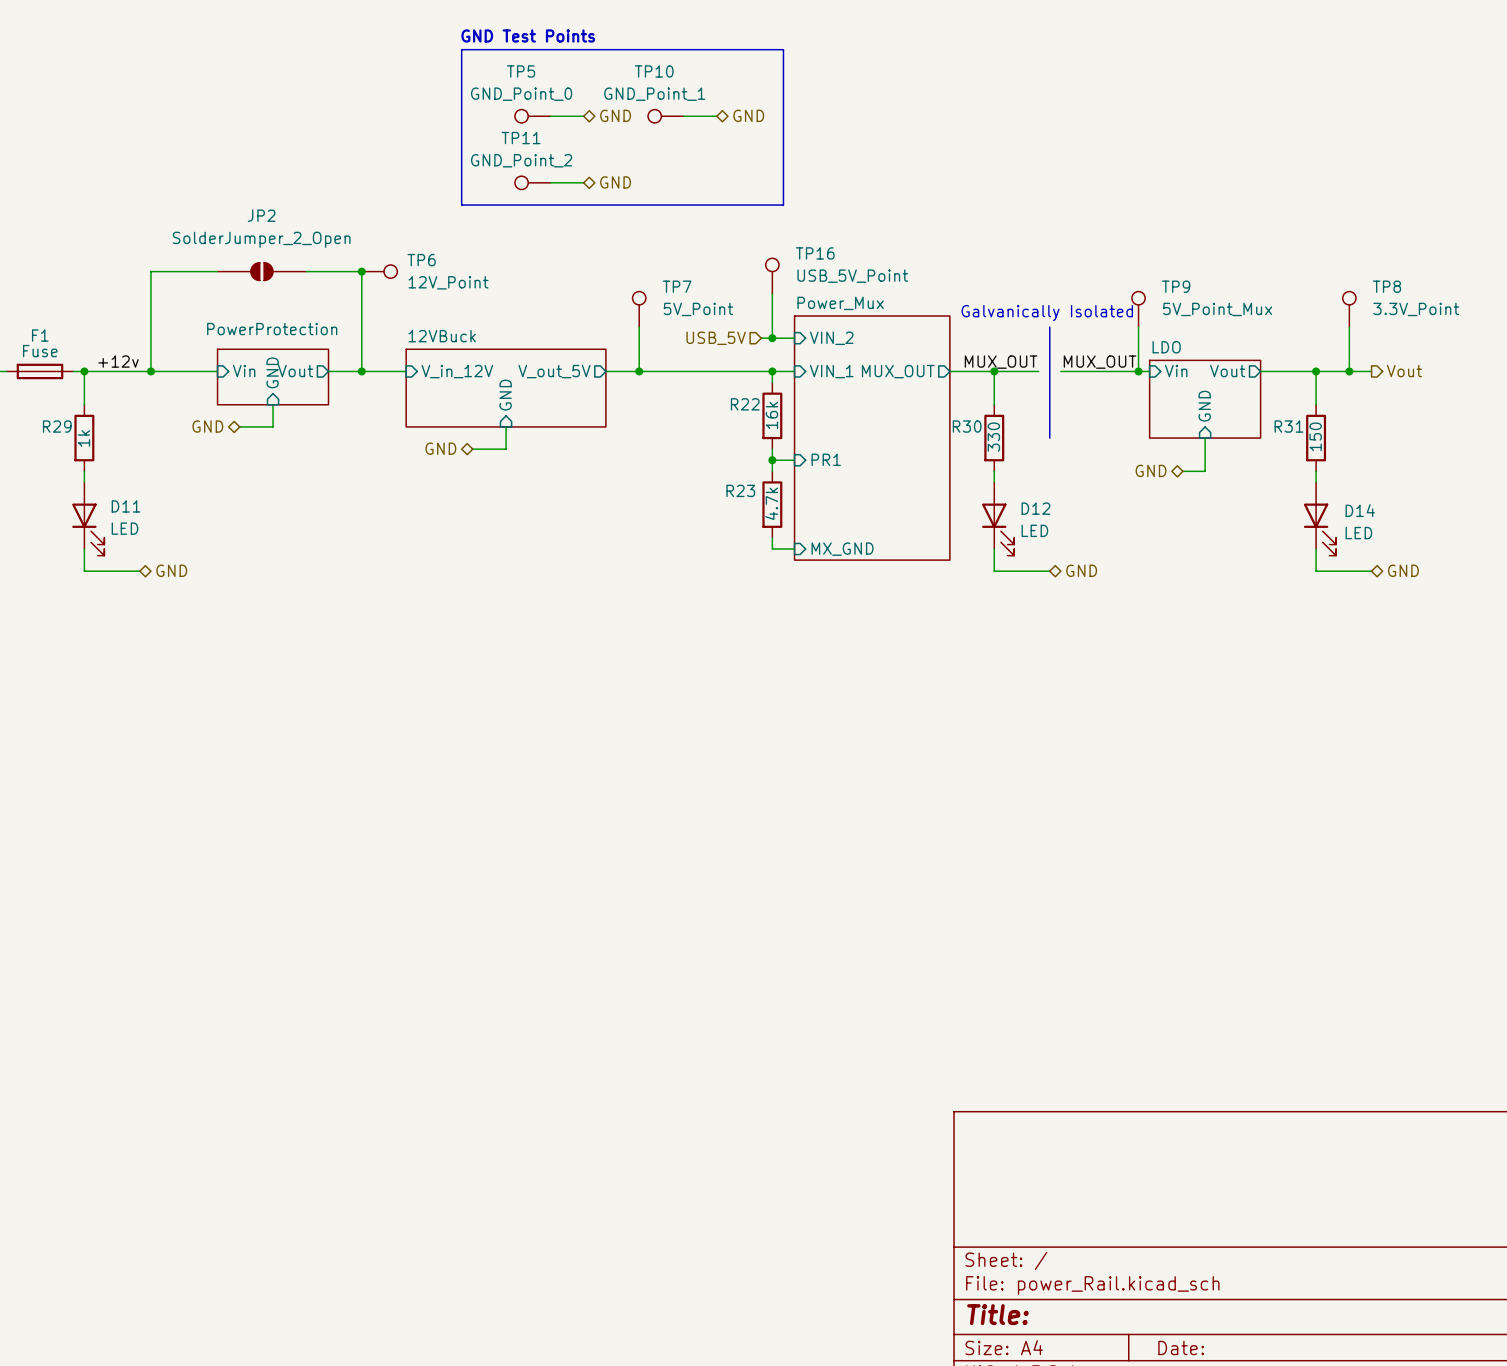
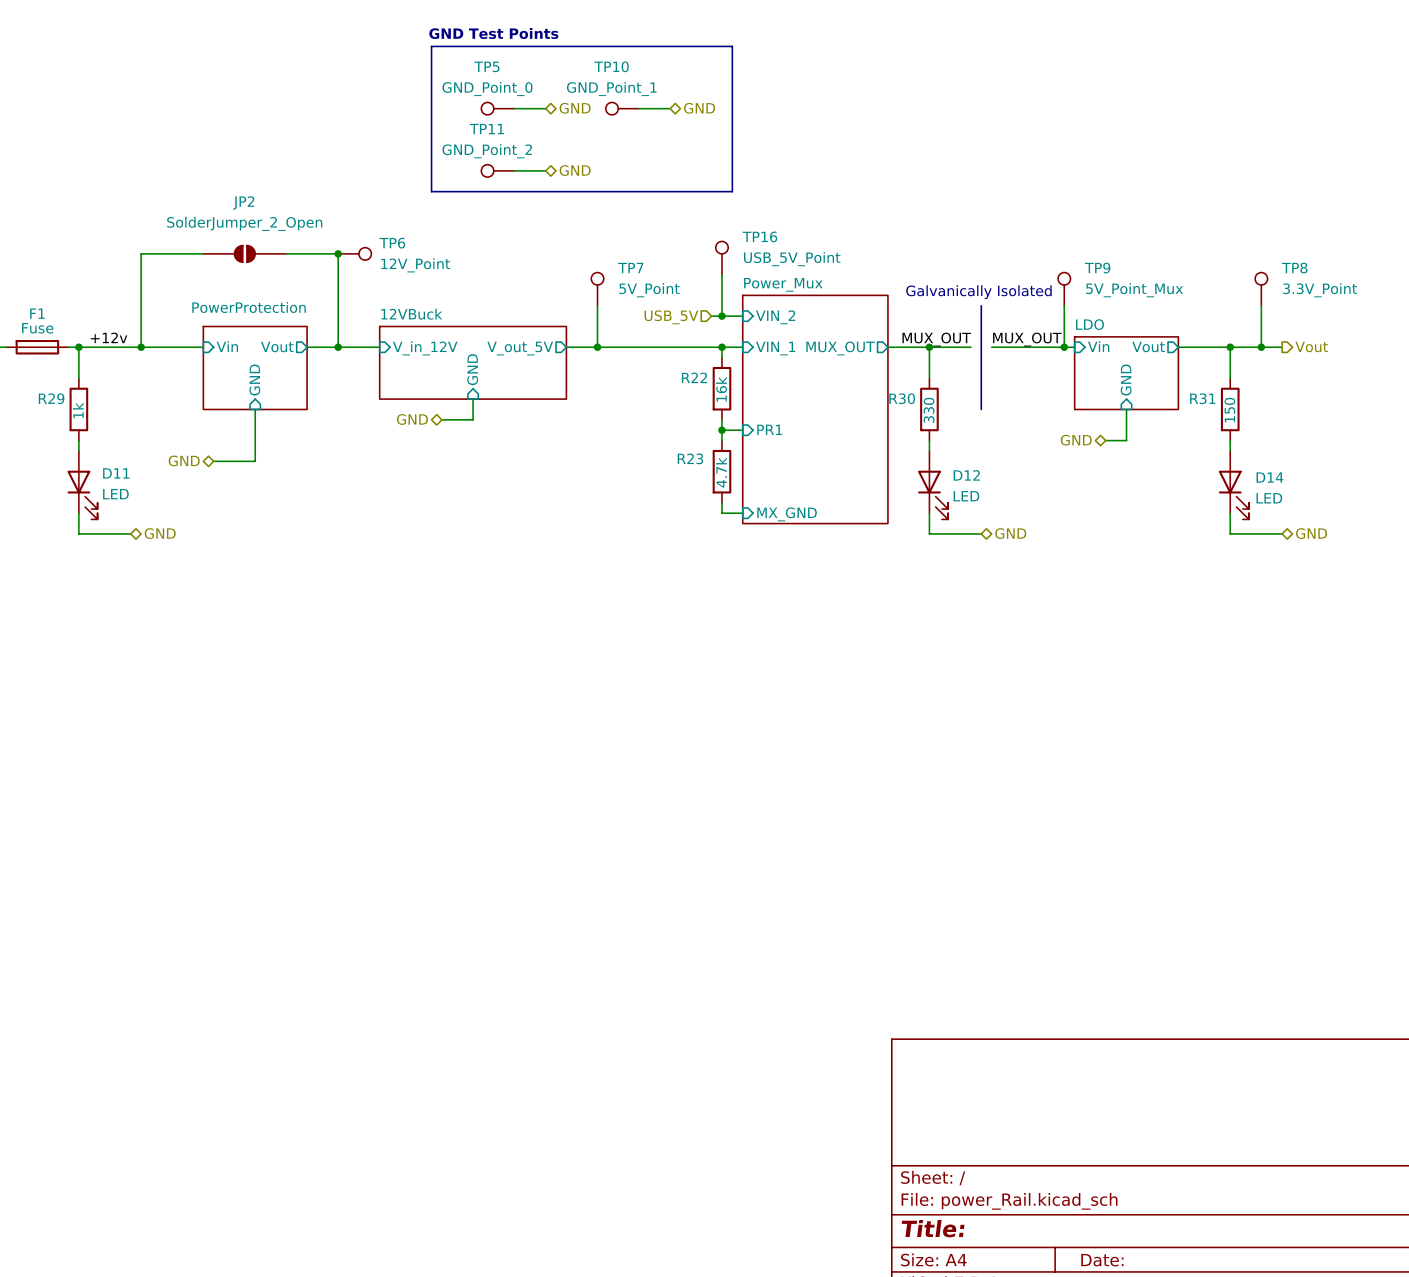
sheet pin position: GND (272, 372) -> GND (254, 380)
sheet PowerProtection: (273, 377) -> none
sheet PowerProtection: none -> (255, 367)
wire: (273, 404) (273, 426) (239, 426) -> none
hierarchical label position: GND (207, 426) -> GND (184, 460)
wire: none -> (255, 409) (255, 461) (213, 461)

